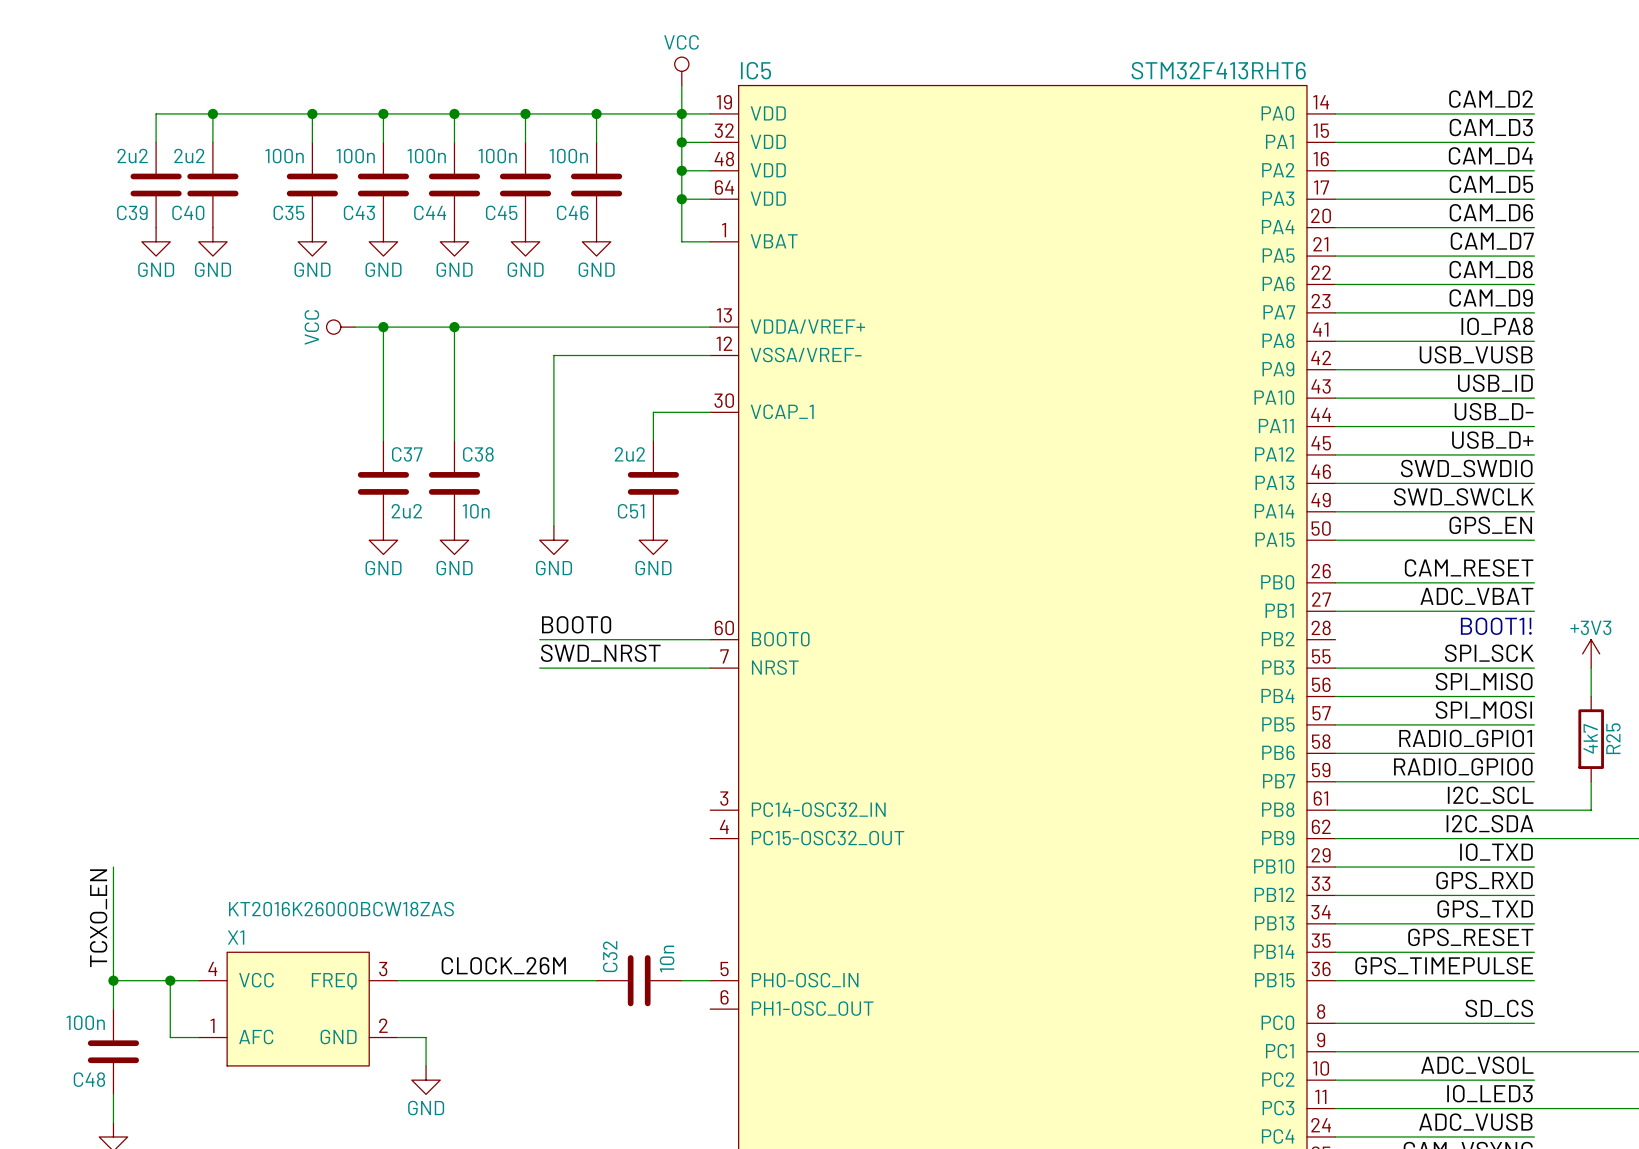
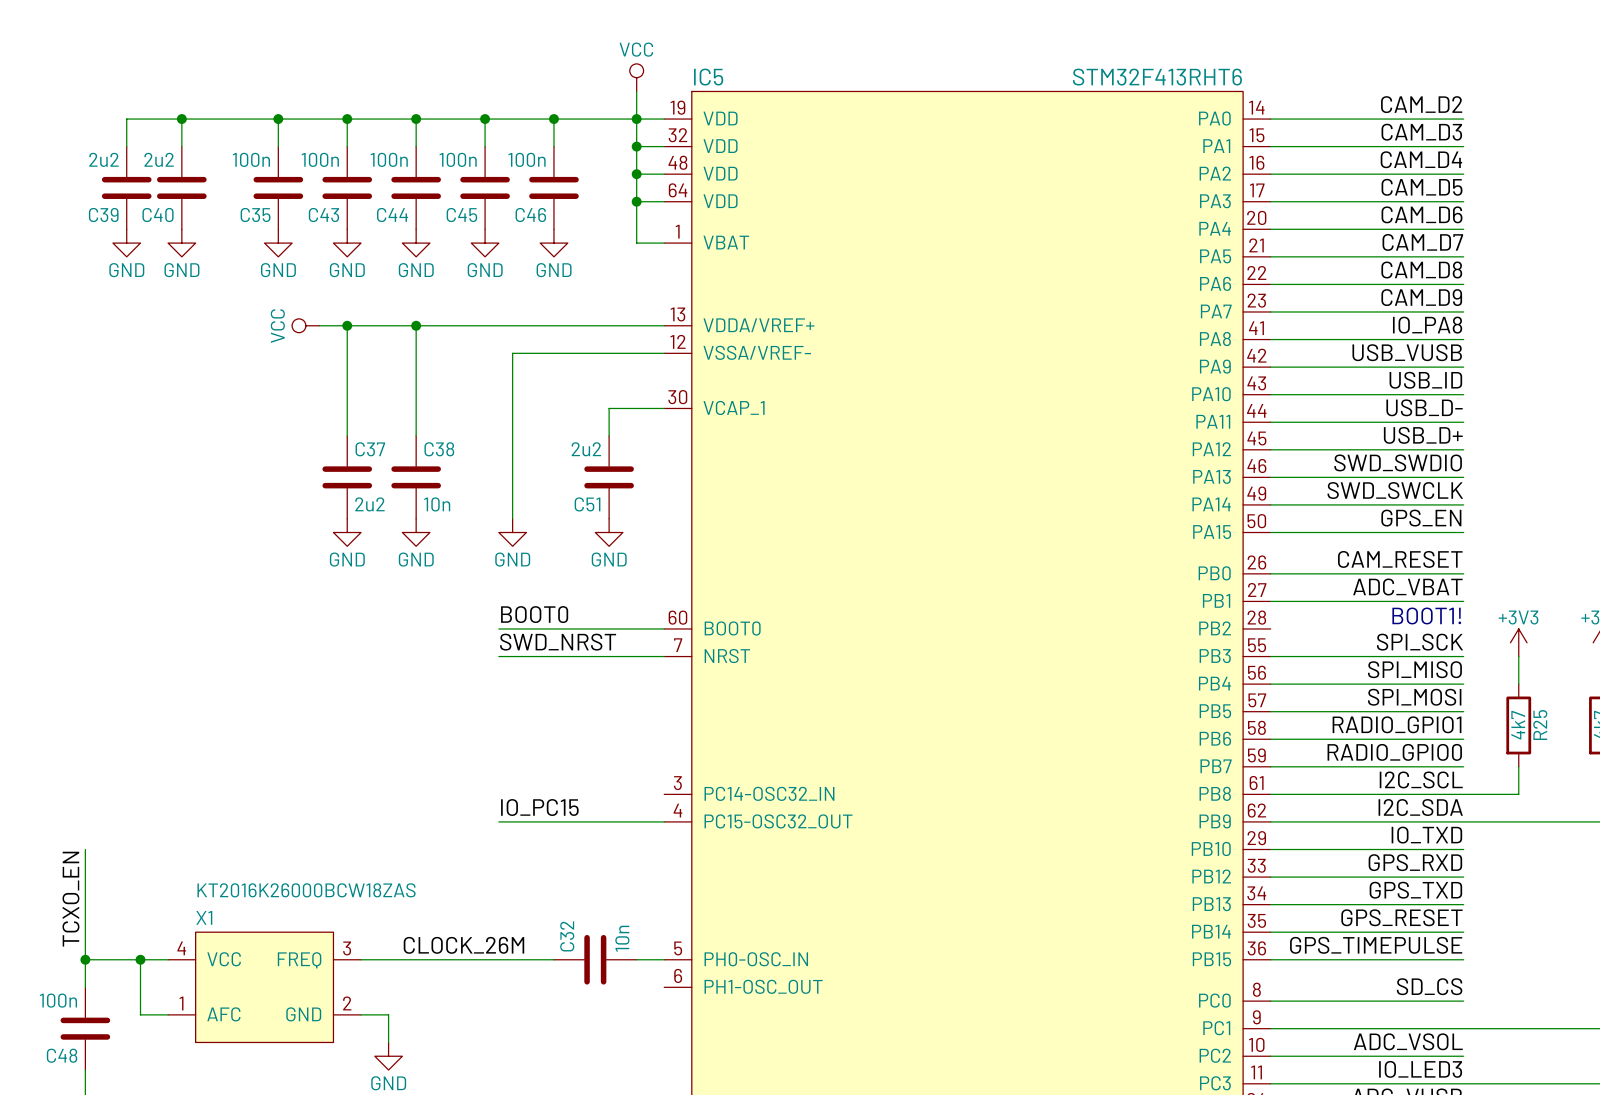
label: none -> IO_PC15 (539, 807)
wire: none -> (498, 821) (664, 821)

